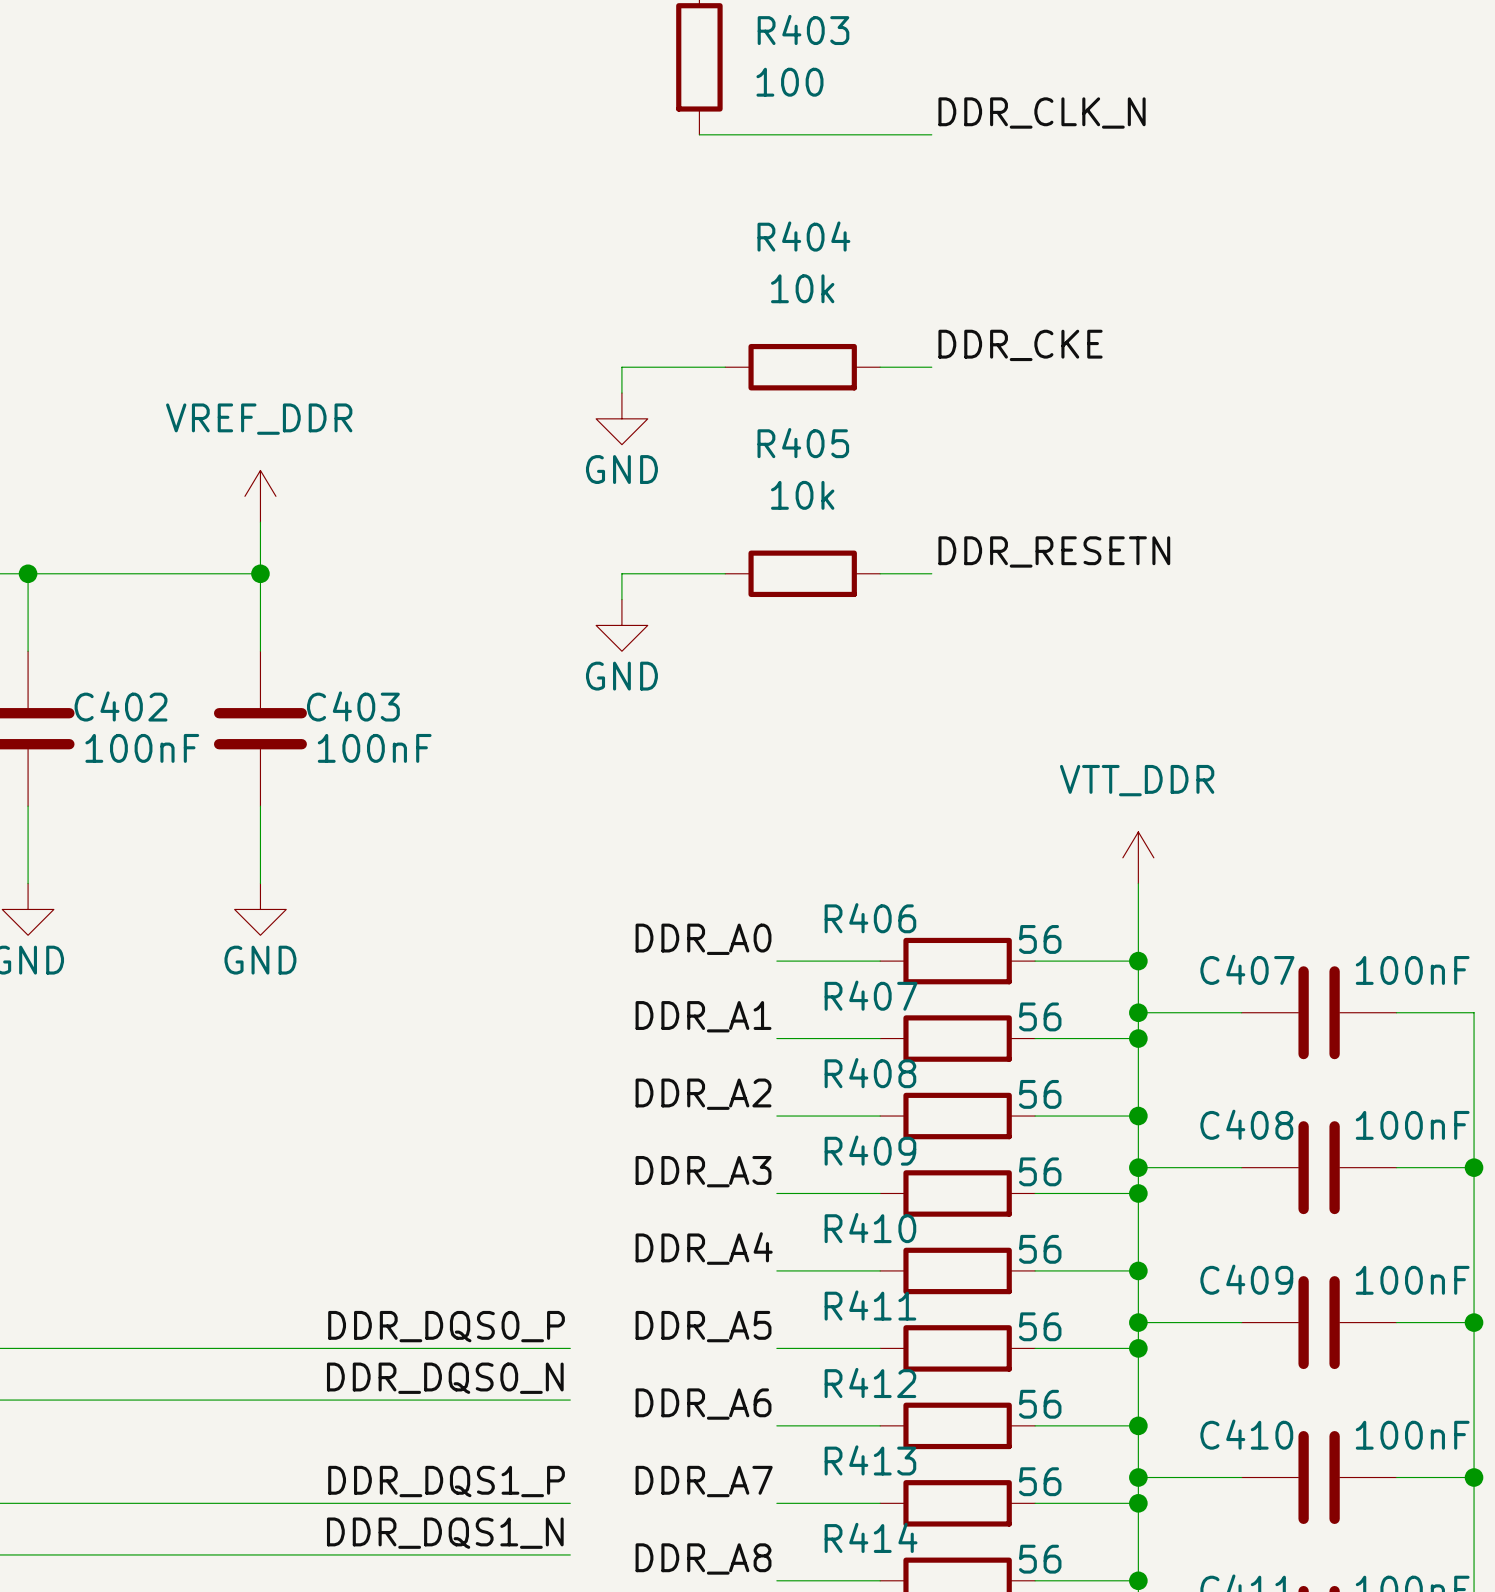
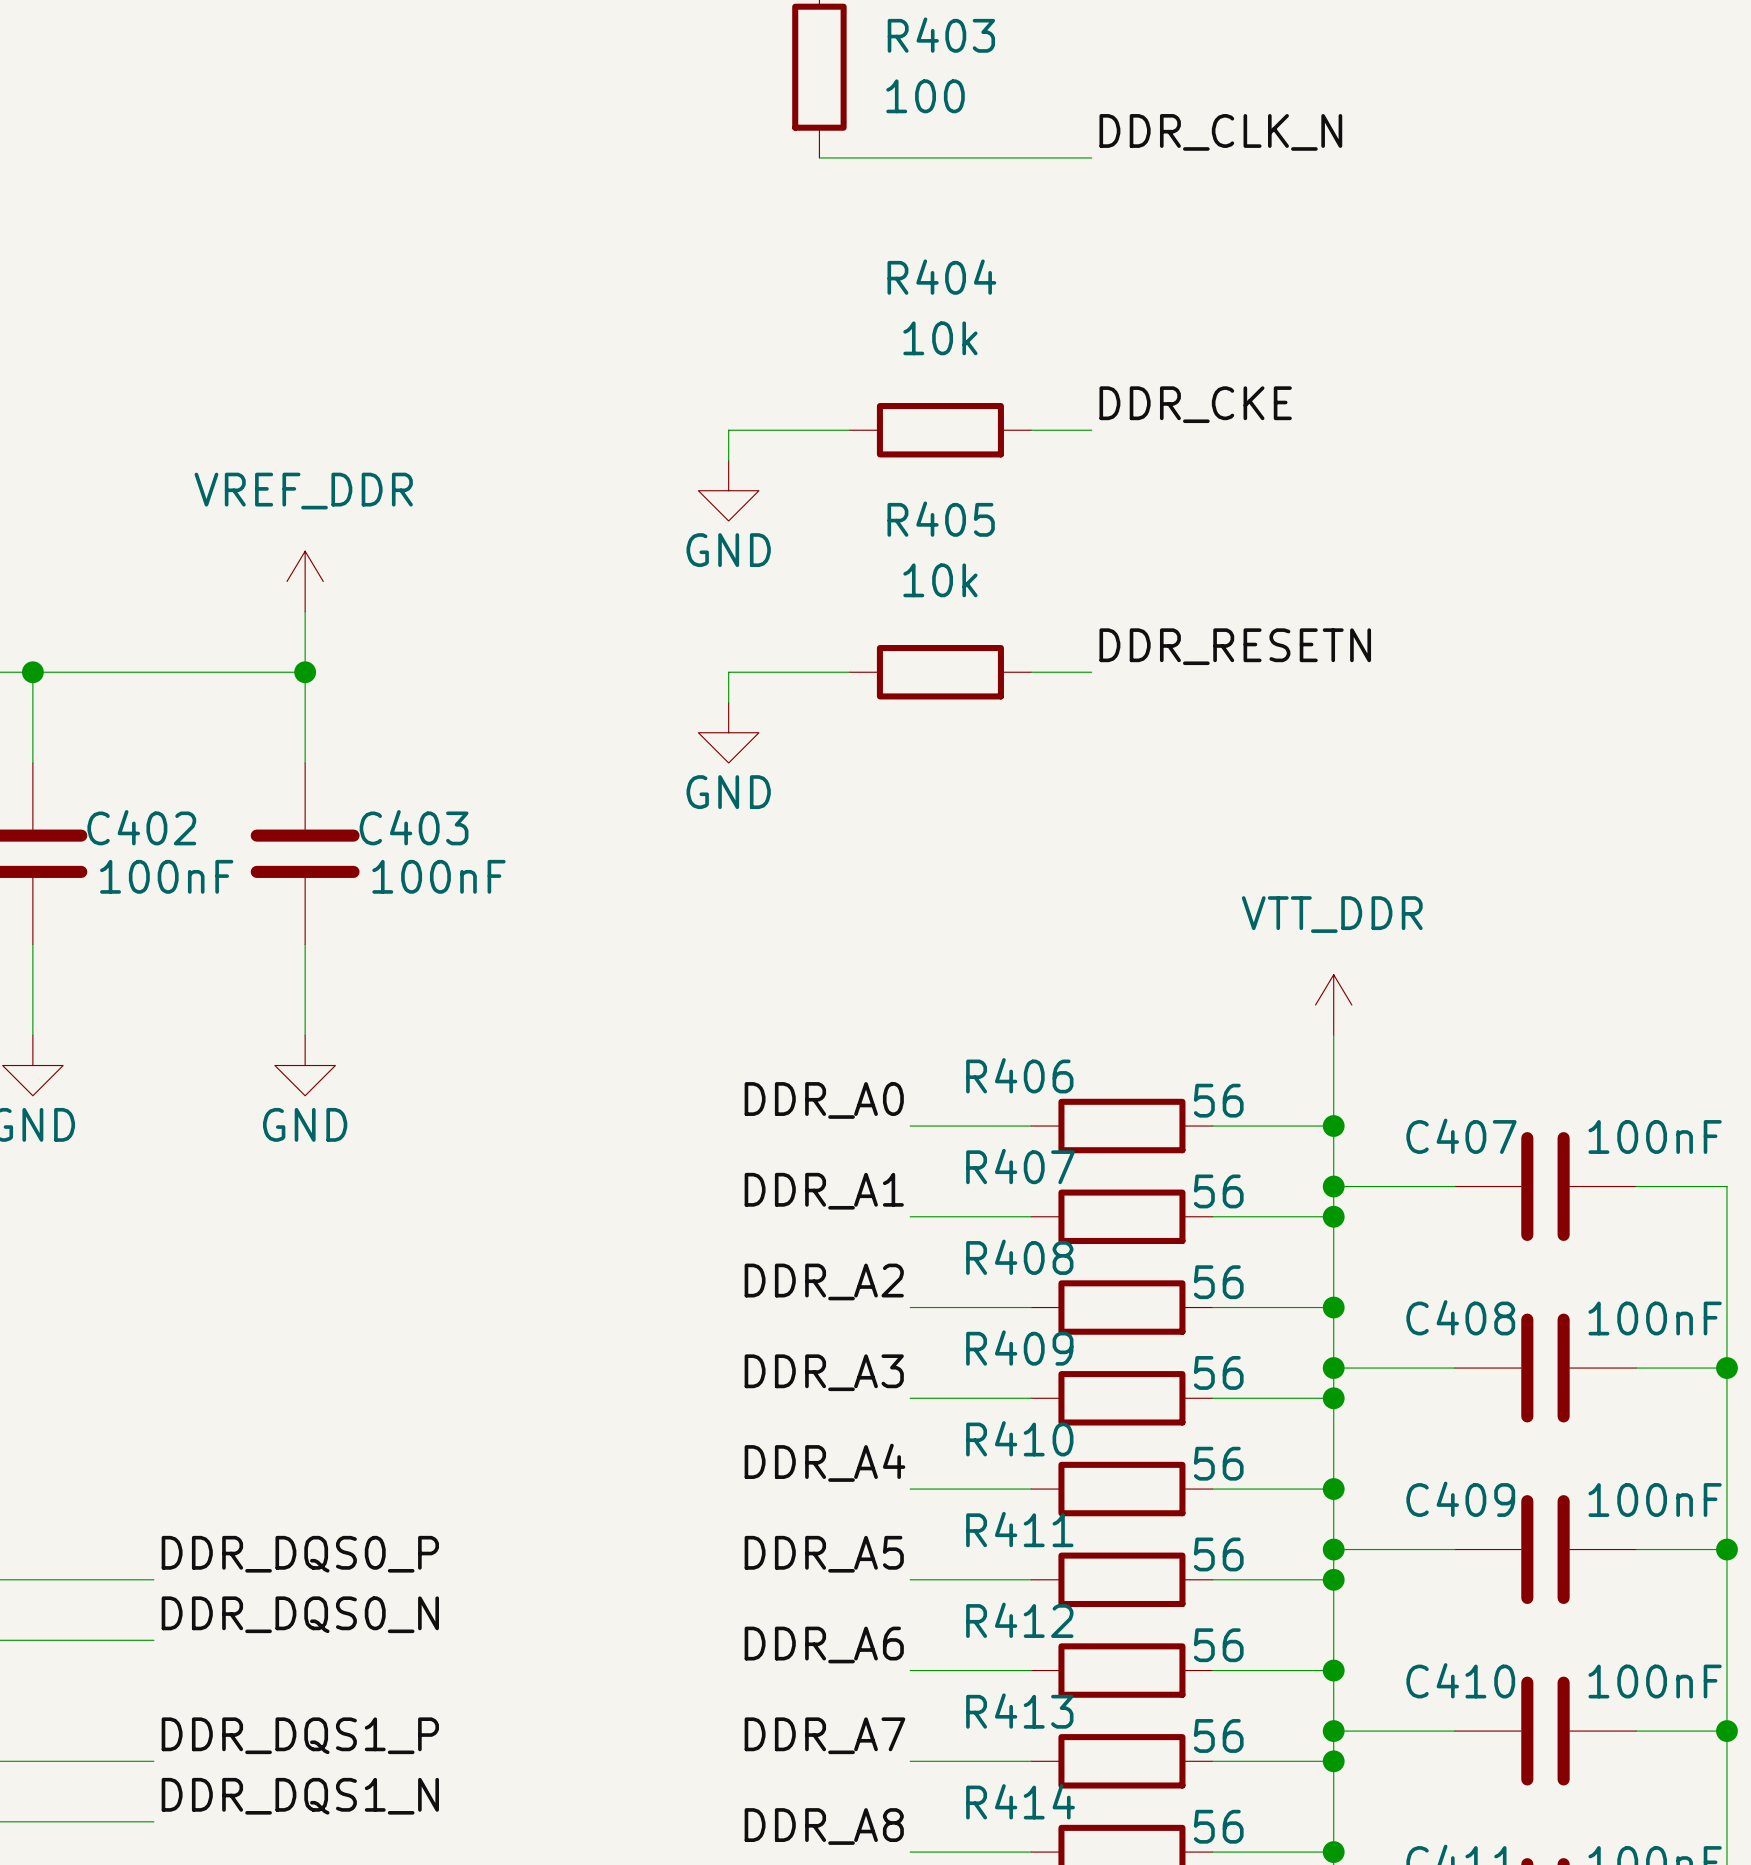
label position: DDR_DQS0_P (446, 1326) -> DDR_DQS0_P (300, 1554)
wire: (131, 1348) (570, 1348) -> none
label position: DDR_DQS0_N (445, 1378) -> DDR_DQS0_N (300, 1614)
wire: (131, 1400) (570, 1400) -> none
label position: DDR_DQS1_P (446, 1481) -> DDR_DQS1_P (300, 1735)
wire: (131, 1503) (570, 1503) -> none
label position: DDR_DQS1_N (445, 1533) -> DDR_DQS1_N (300, 1796)
wire: (131, 1554) (570, 1554) -> none

